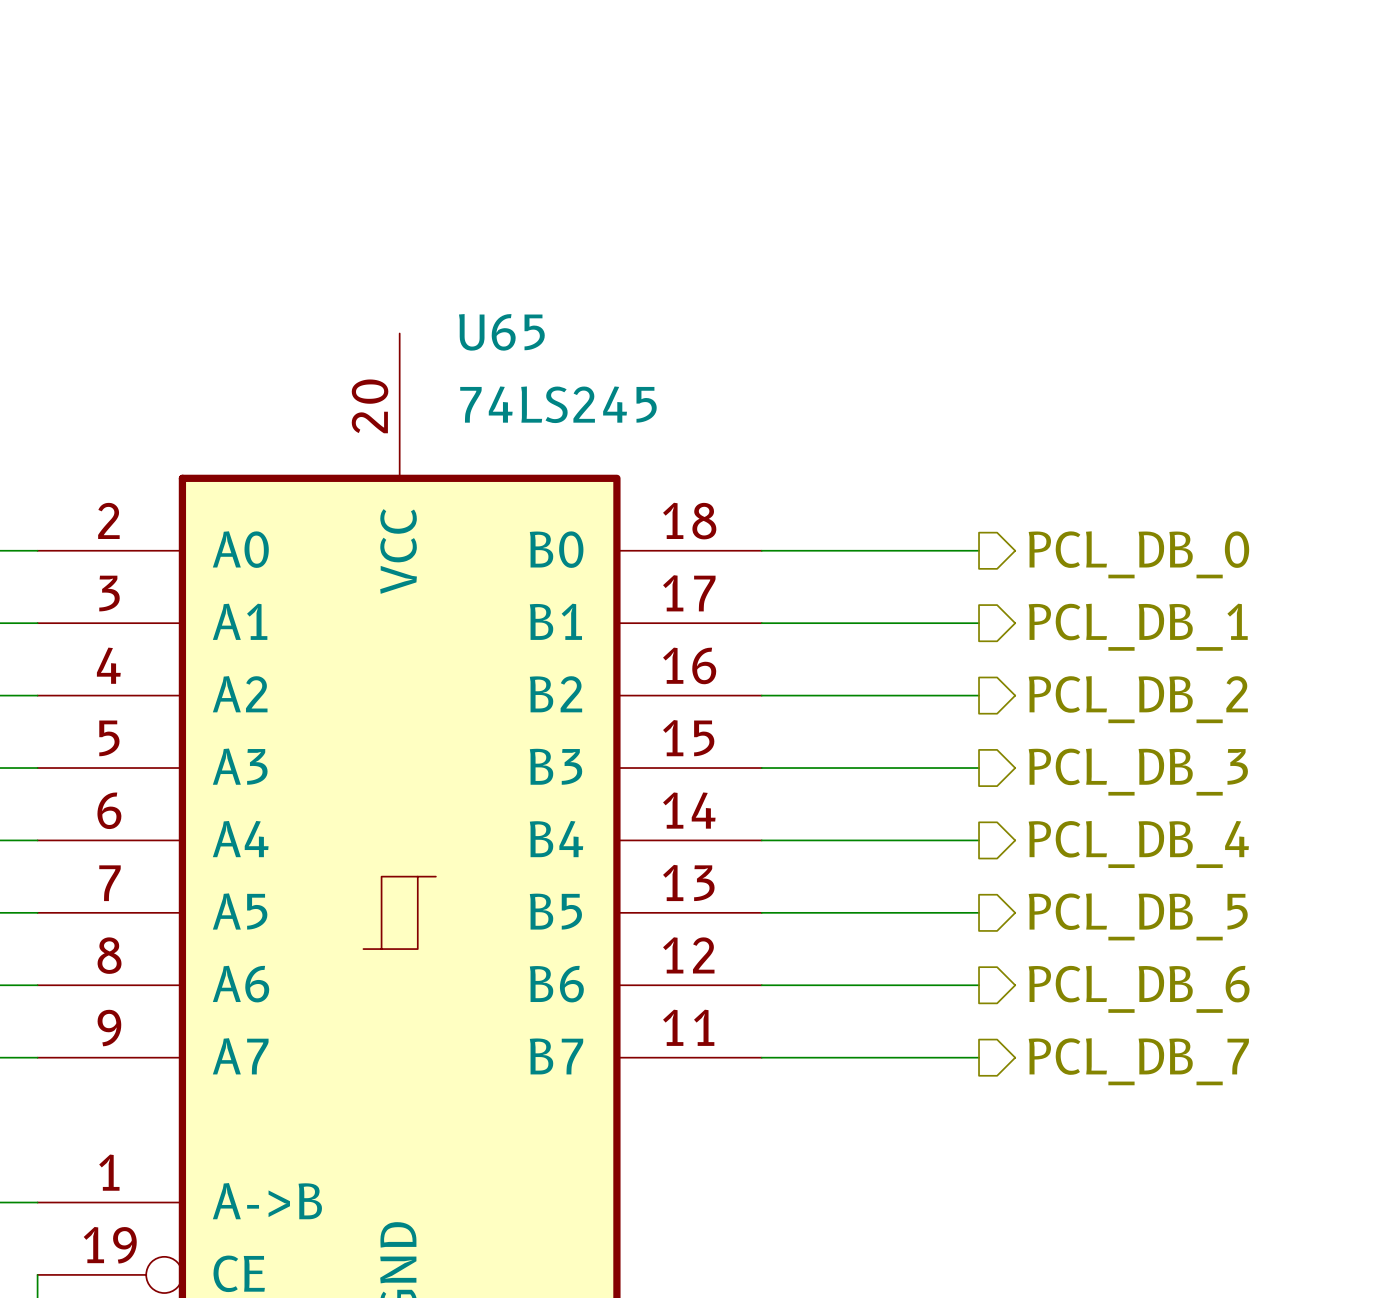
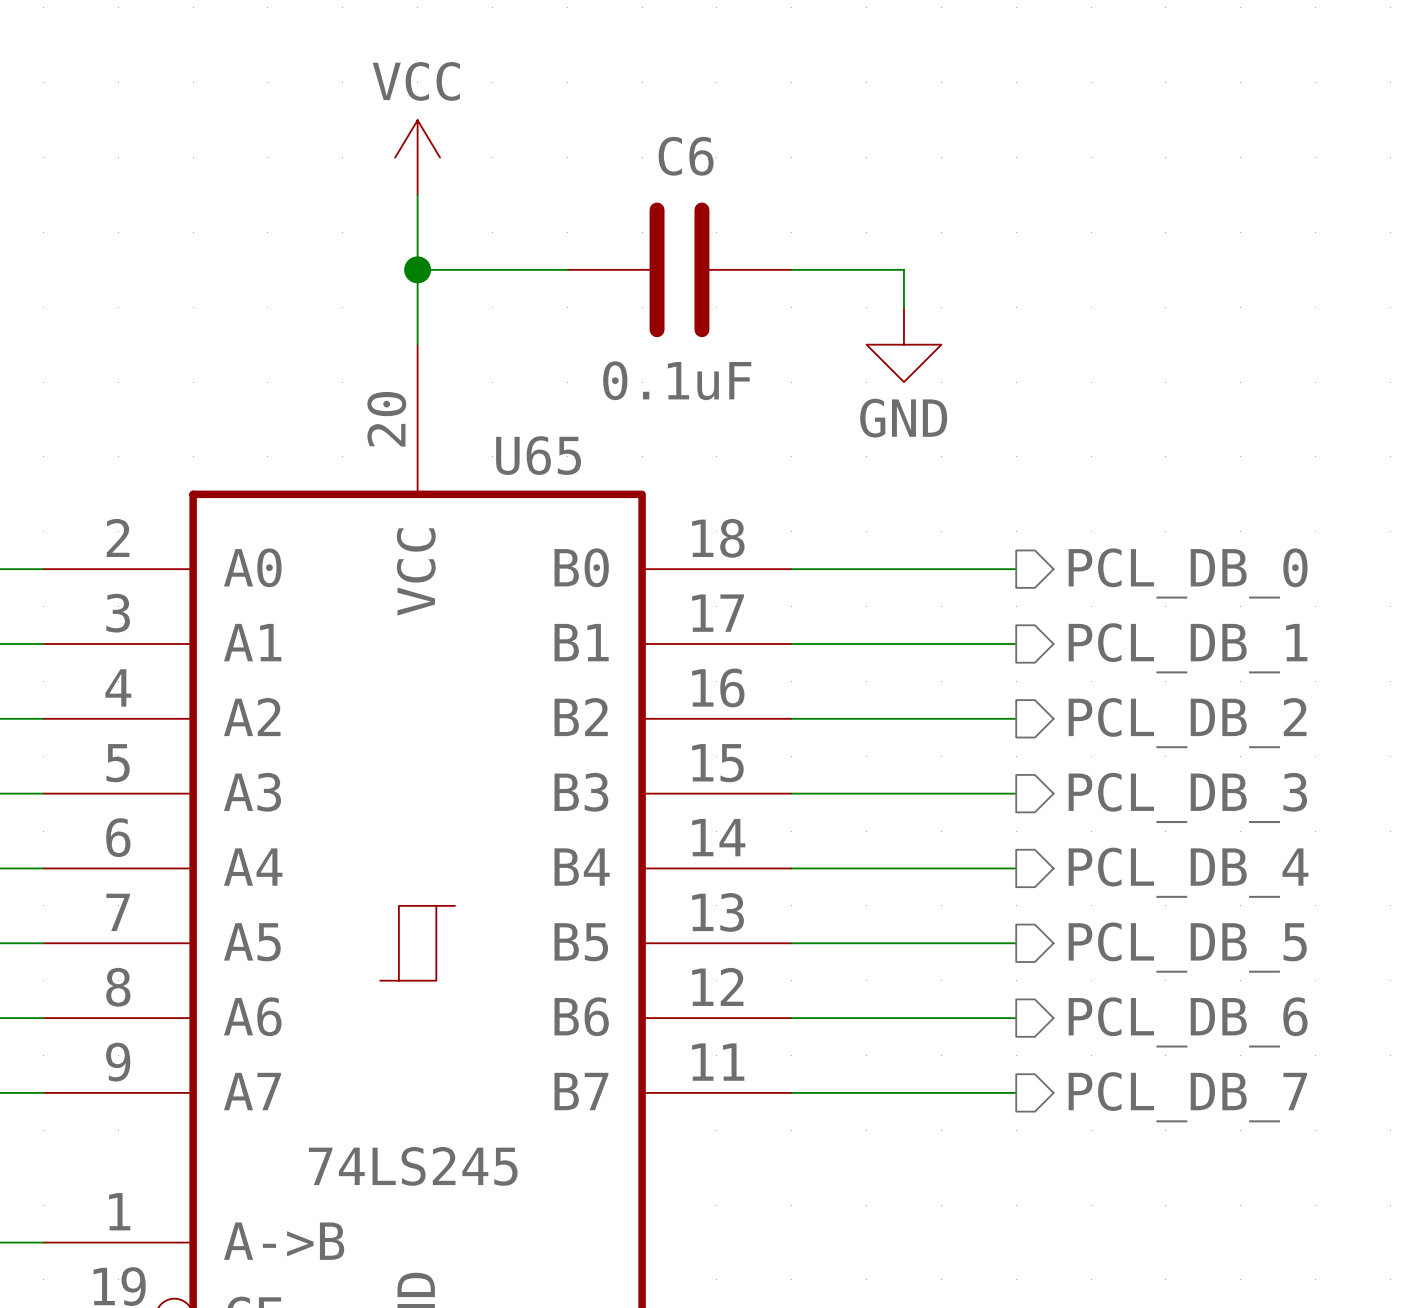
power symbol: none -> VCC (417, 157)
wire: none -> (417, 195) (417, 344)
wire: none -> (417, 269) (567, 269)
junction: none -> (417, 269)
C6: none -> 0.1uF (679, 269)
wire: none -> (791, 269) (903, 269) (903, 307)
U65 name position: U65 (501, 332) -> U65 (538, 455)
power symbol: none -> GND (903, 344)
U65 value position: 74LS245 (558, 404) -> 74LS245 (413, 1166)

